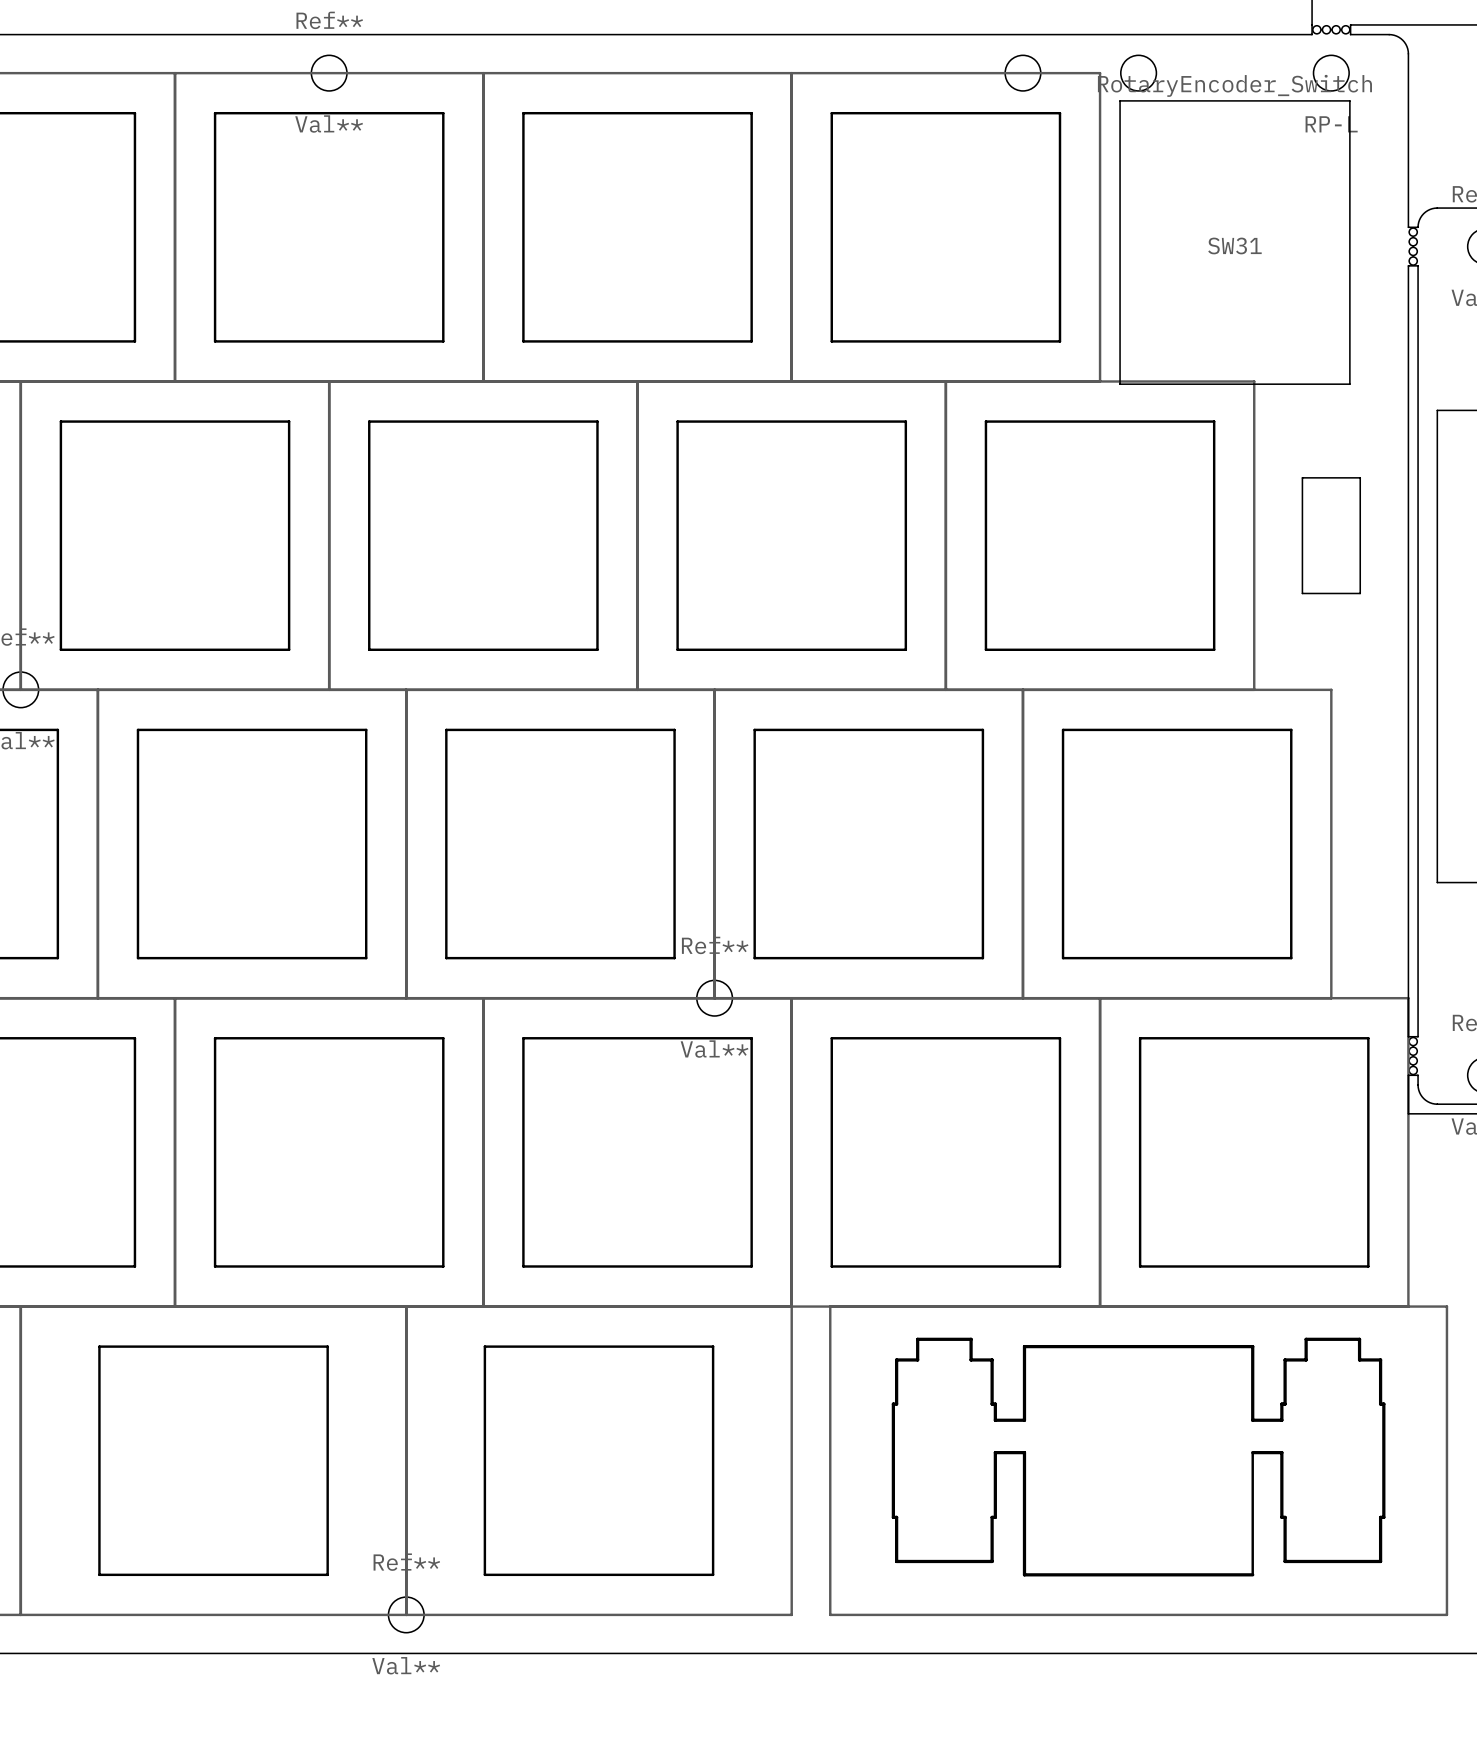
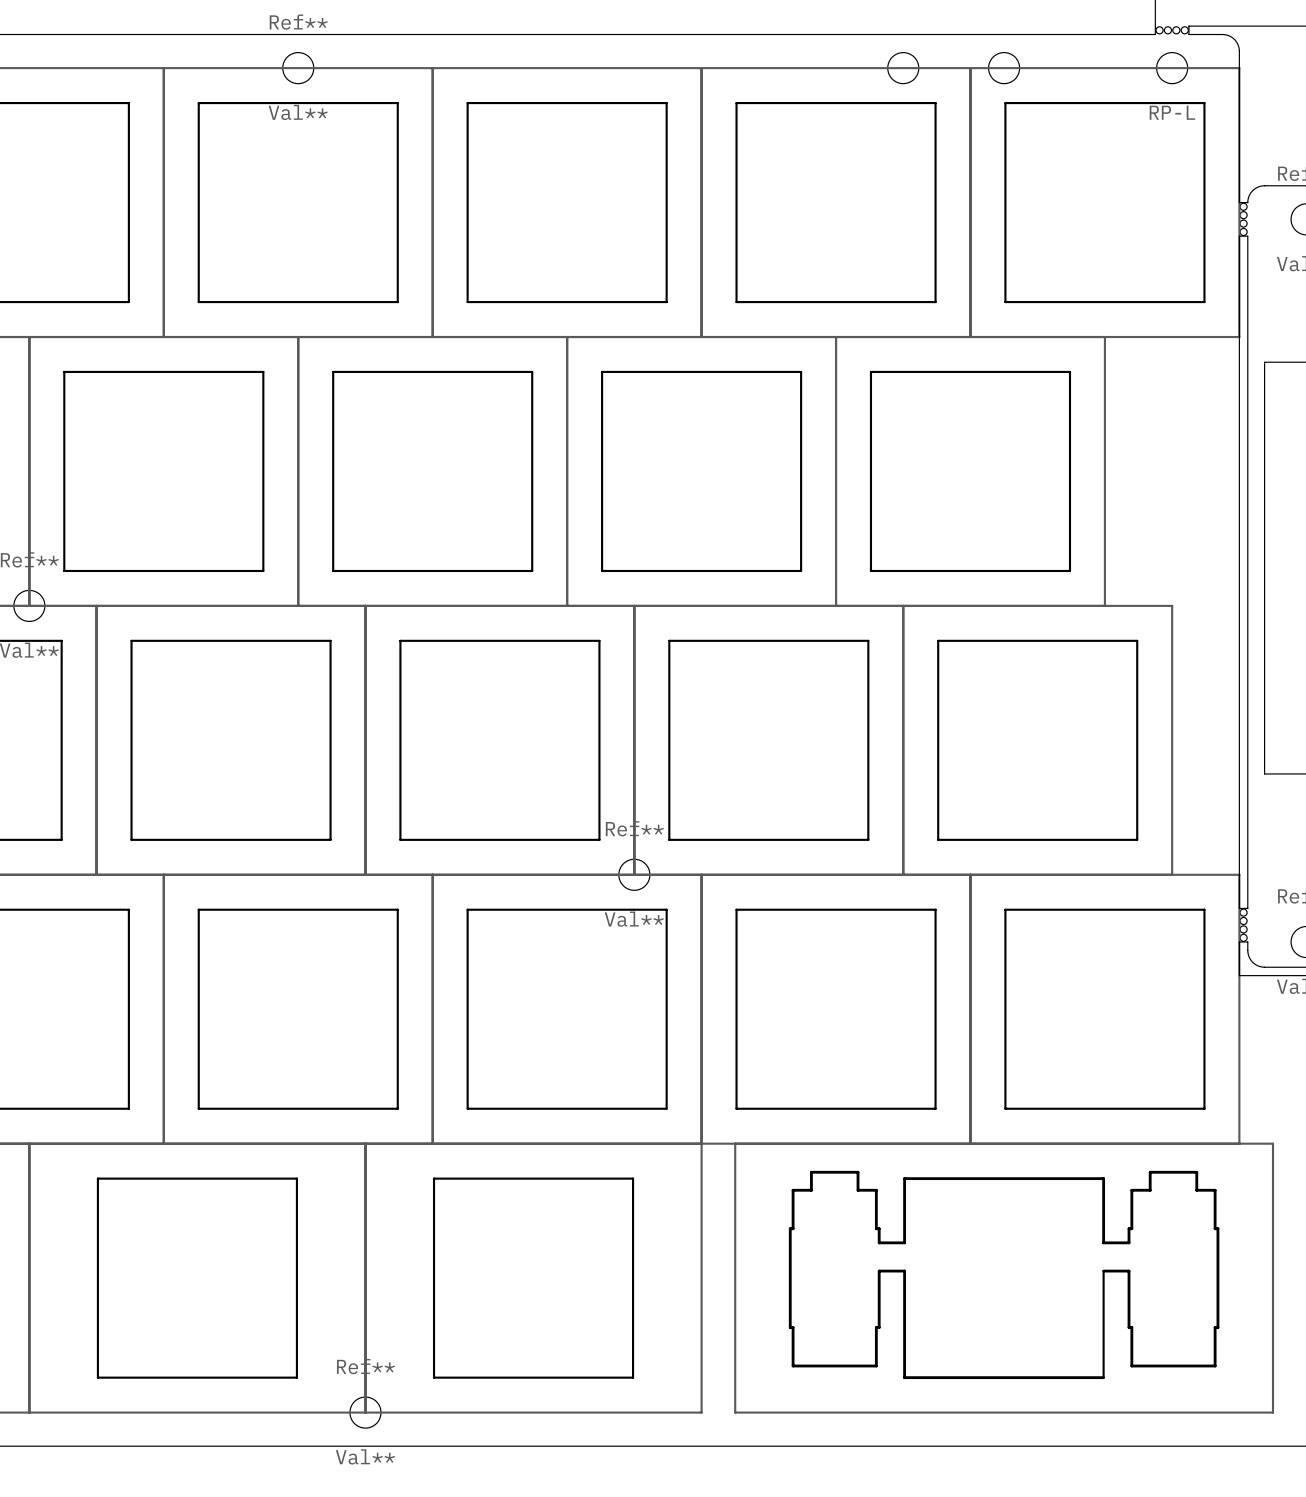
drawing: none -> [969, 67, 1241, 339]
SW31: RotaryEncoder_Switch (1234, 242) -> none
board edge: (1302, 477) (1360, 477) (1360, 593) (1302, 593) (1302, 477) -> none

